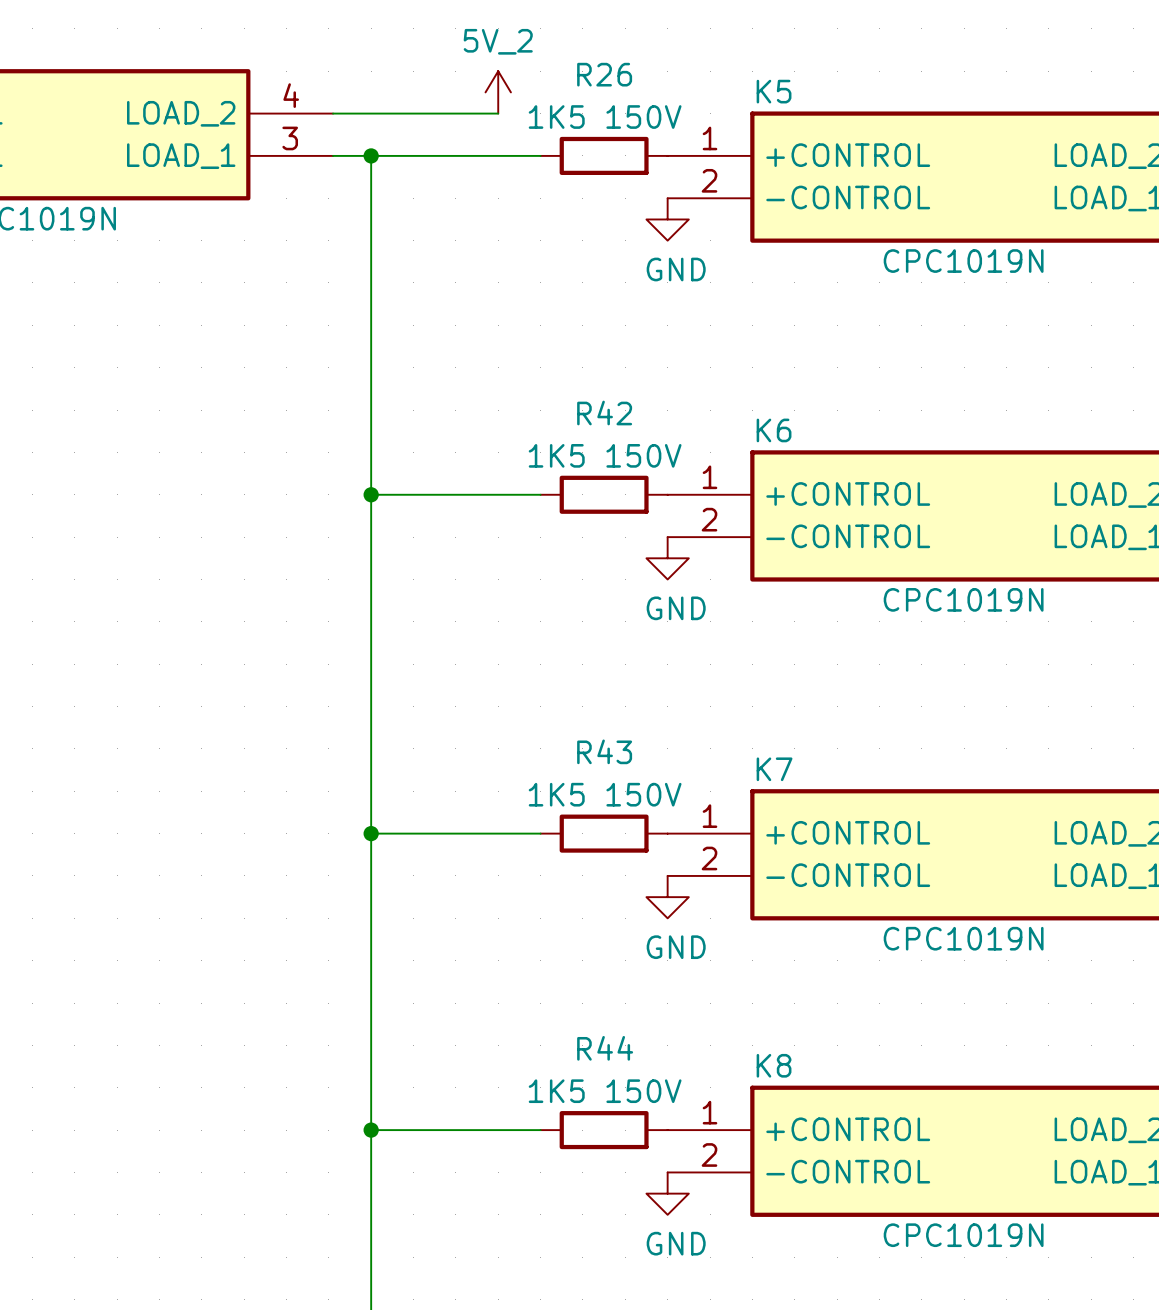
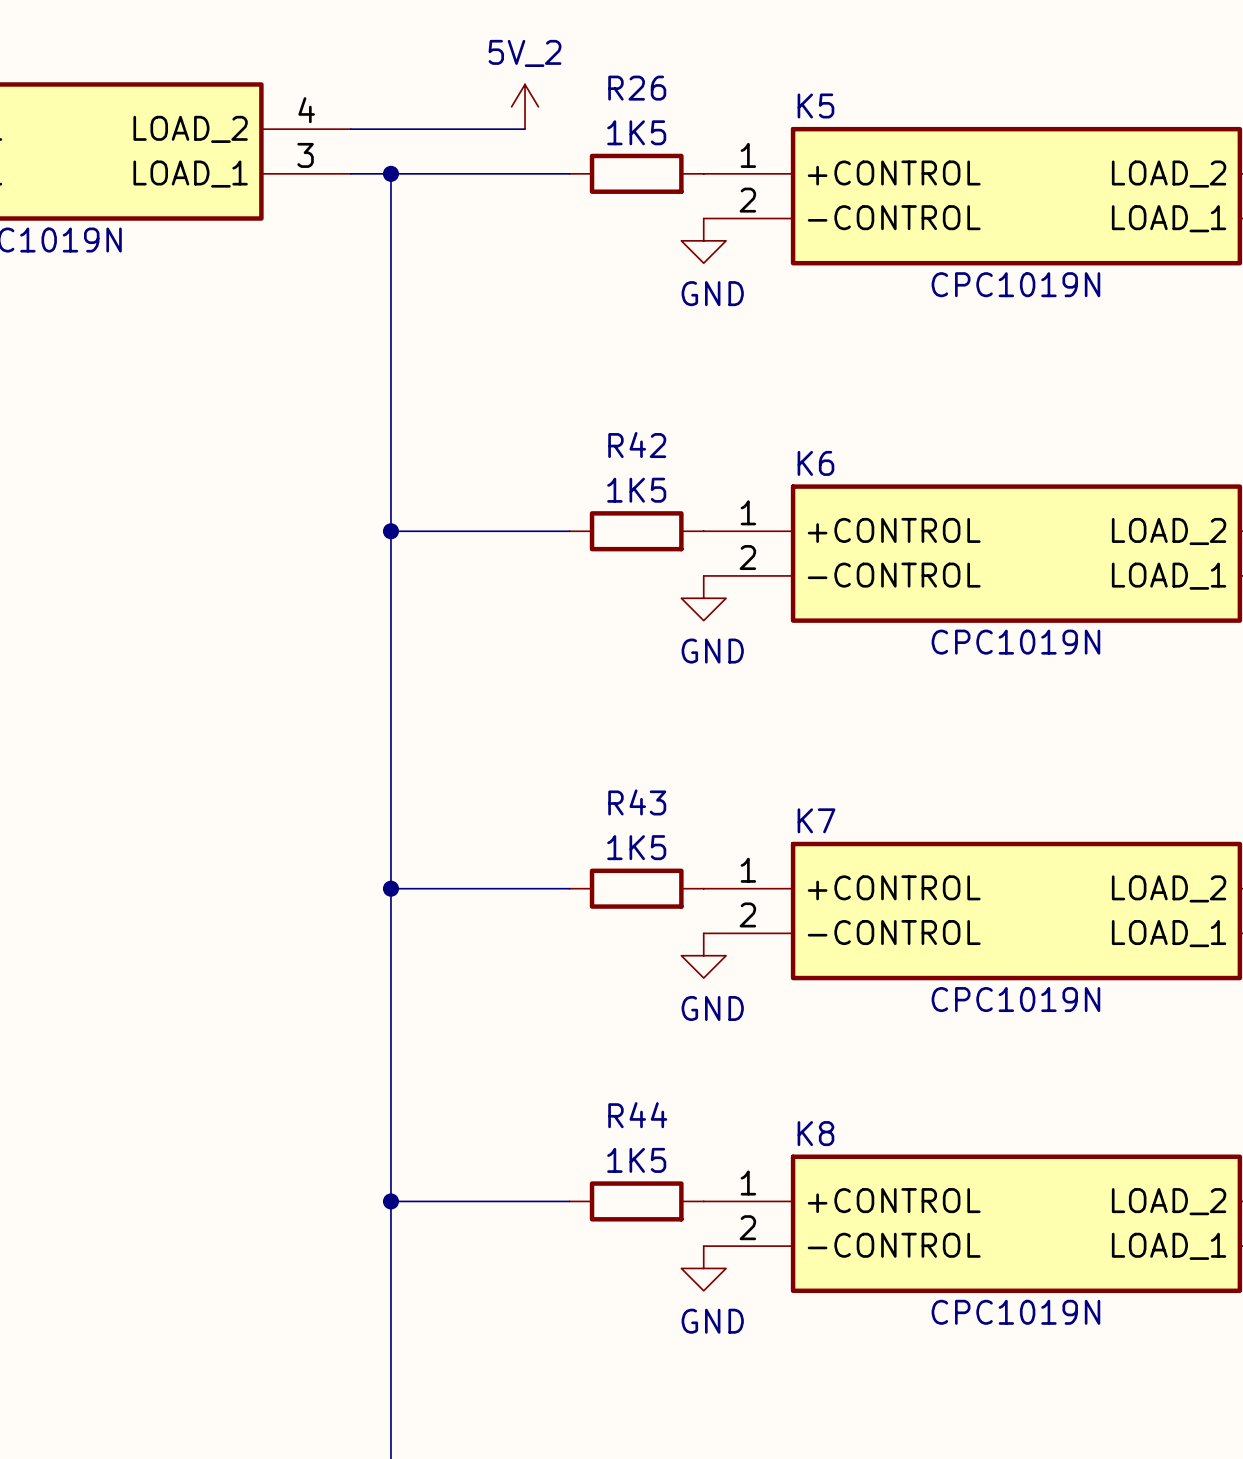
R26 value: 1K5 150V (605, 117) -> 1K5 (636, 132)
R42 value: 1K5 150V (605, 455) -> 1K5 (636, 490)
R43 value: 1K5 150V (605, 794) -> 1K5 (636, 847)
R44 value: 1K5 150V (605, 1091) -> 1K5 (636, 1160)

